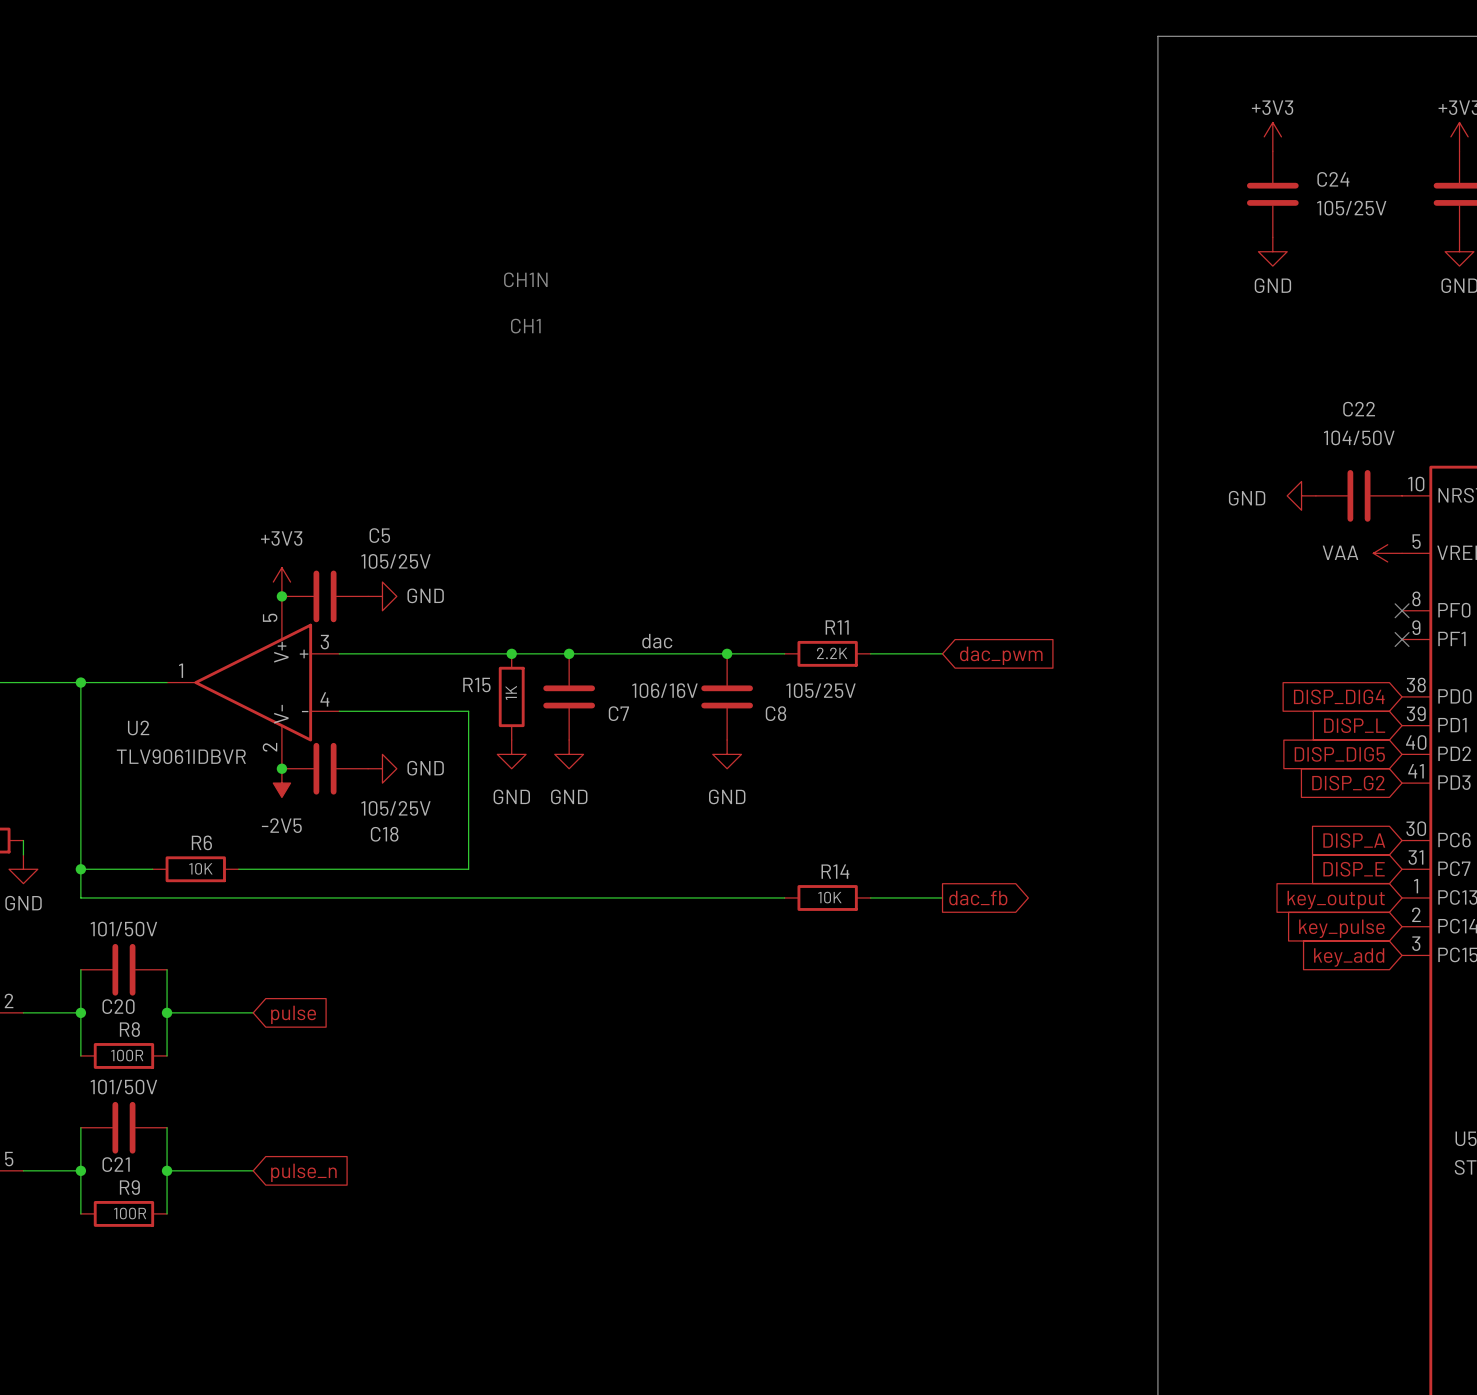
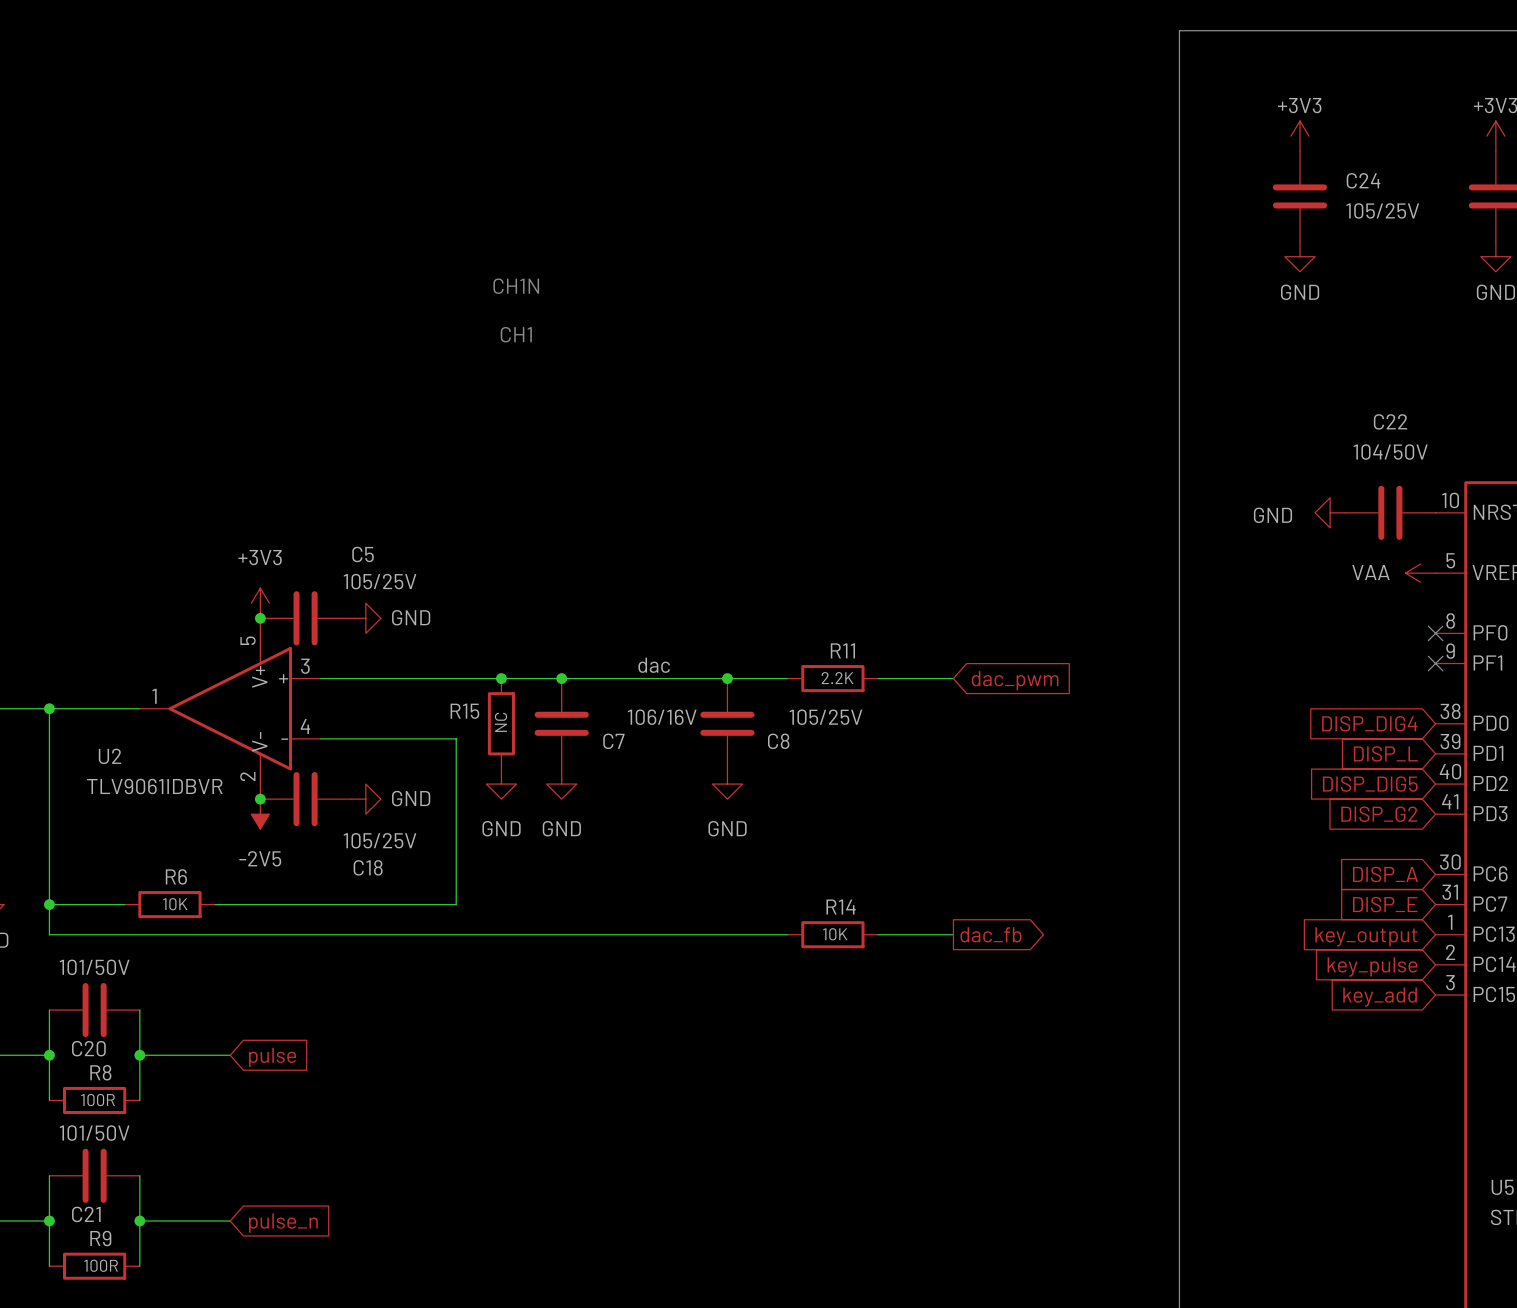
R15 value: 1K (511, 692) -> NC (501, 722)

